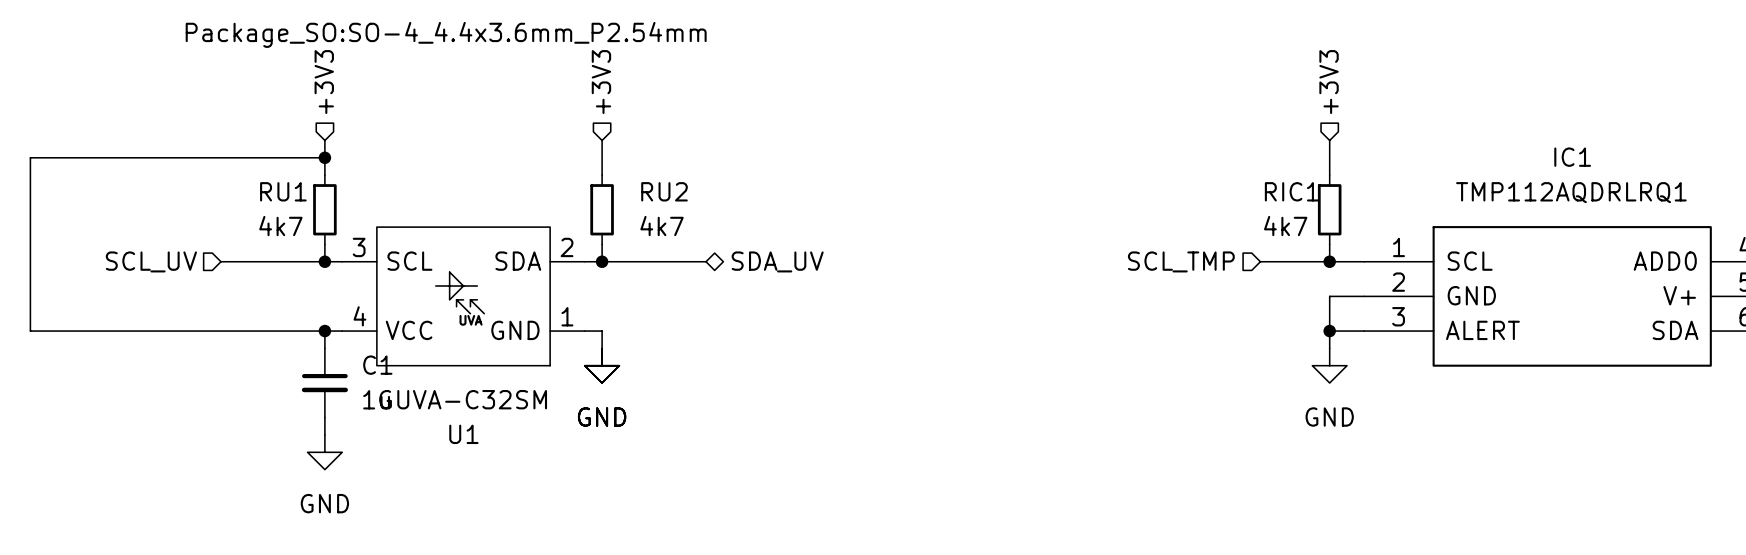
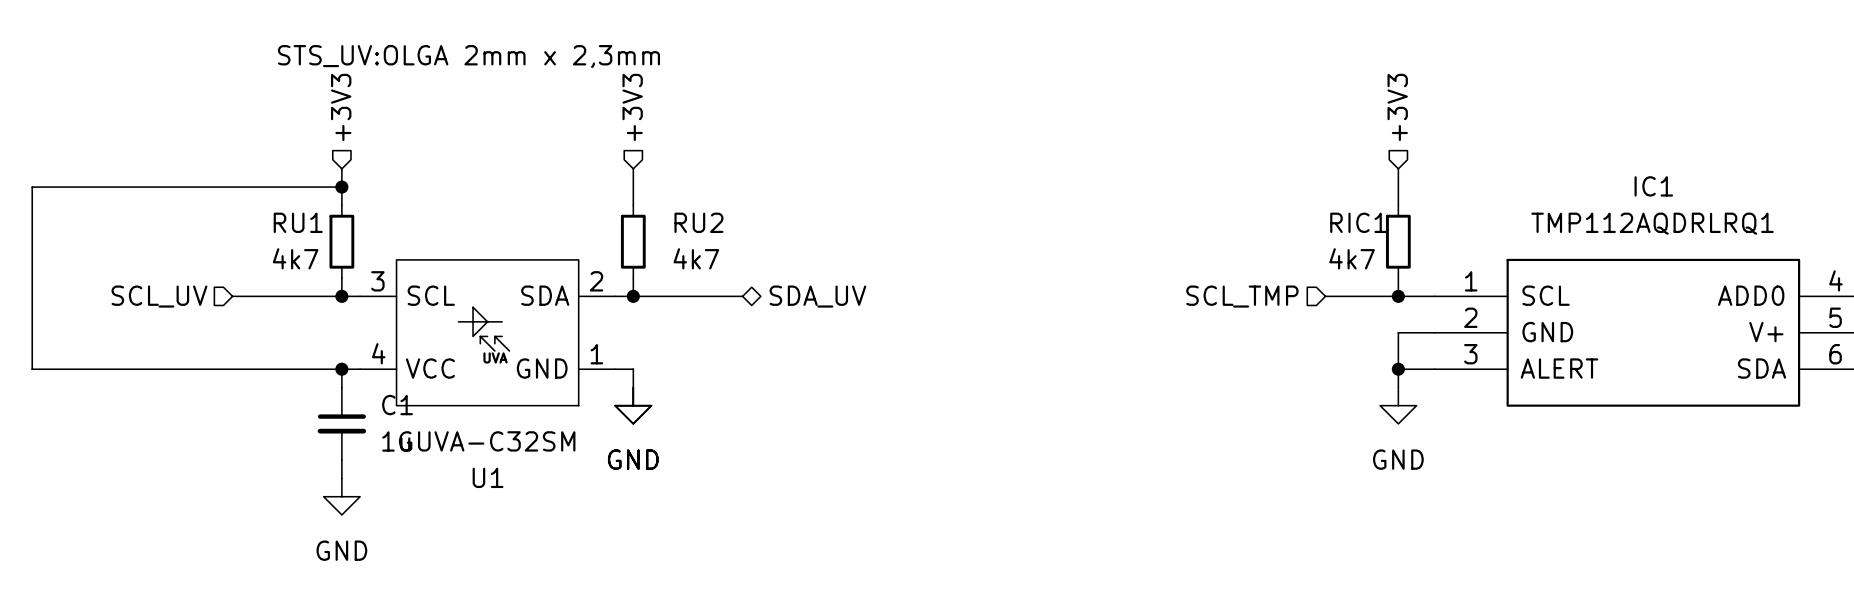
U1 text: Package_SO:SO-4_4.4x3.6mm_P2.54mm (446, 34) -> STS_UV:OLGA 2mm x 2,3mm (468, 56)

